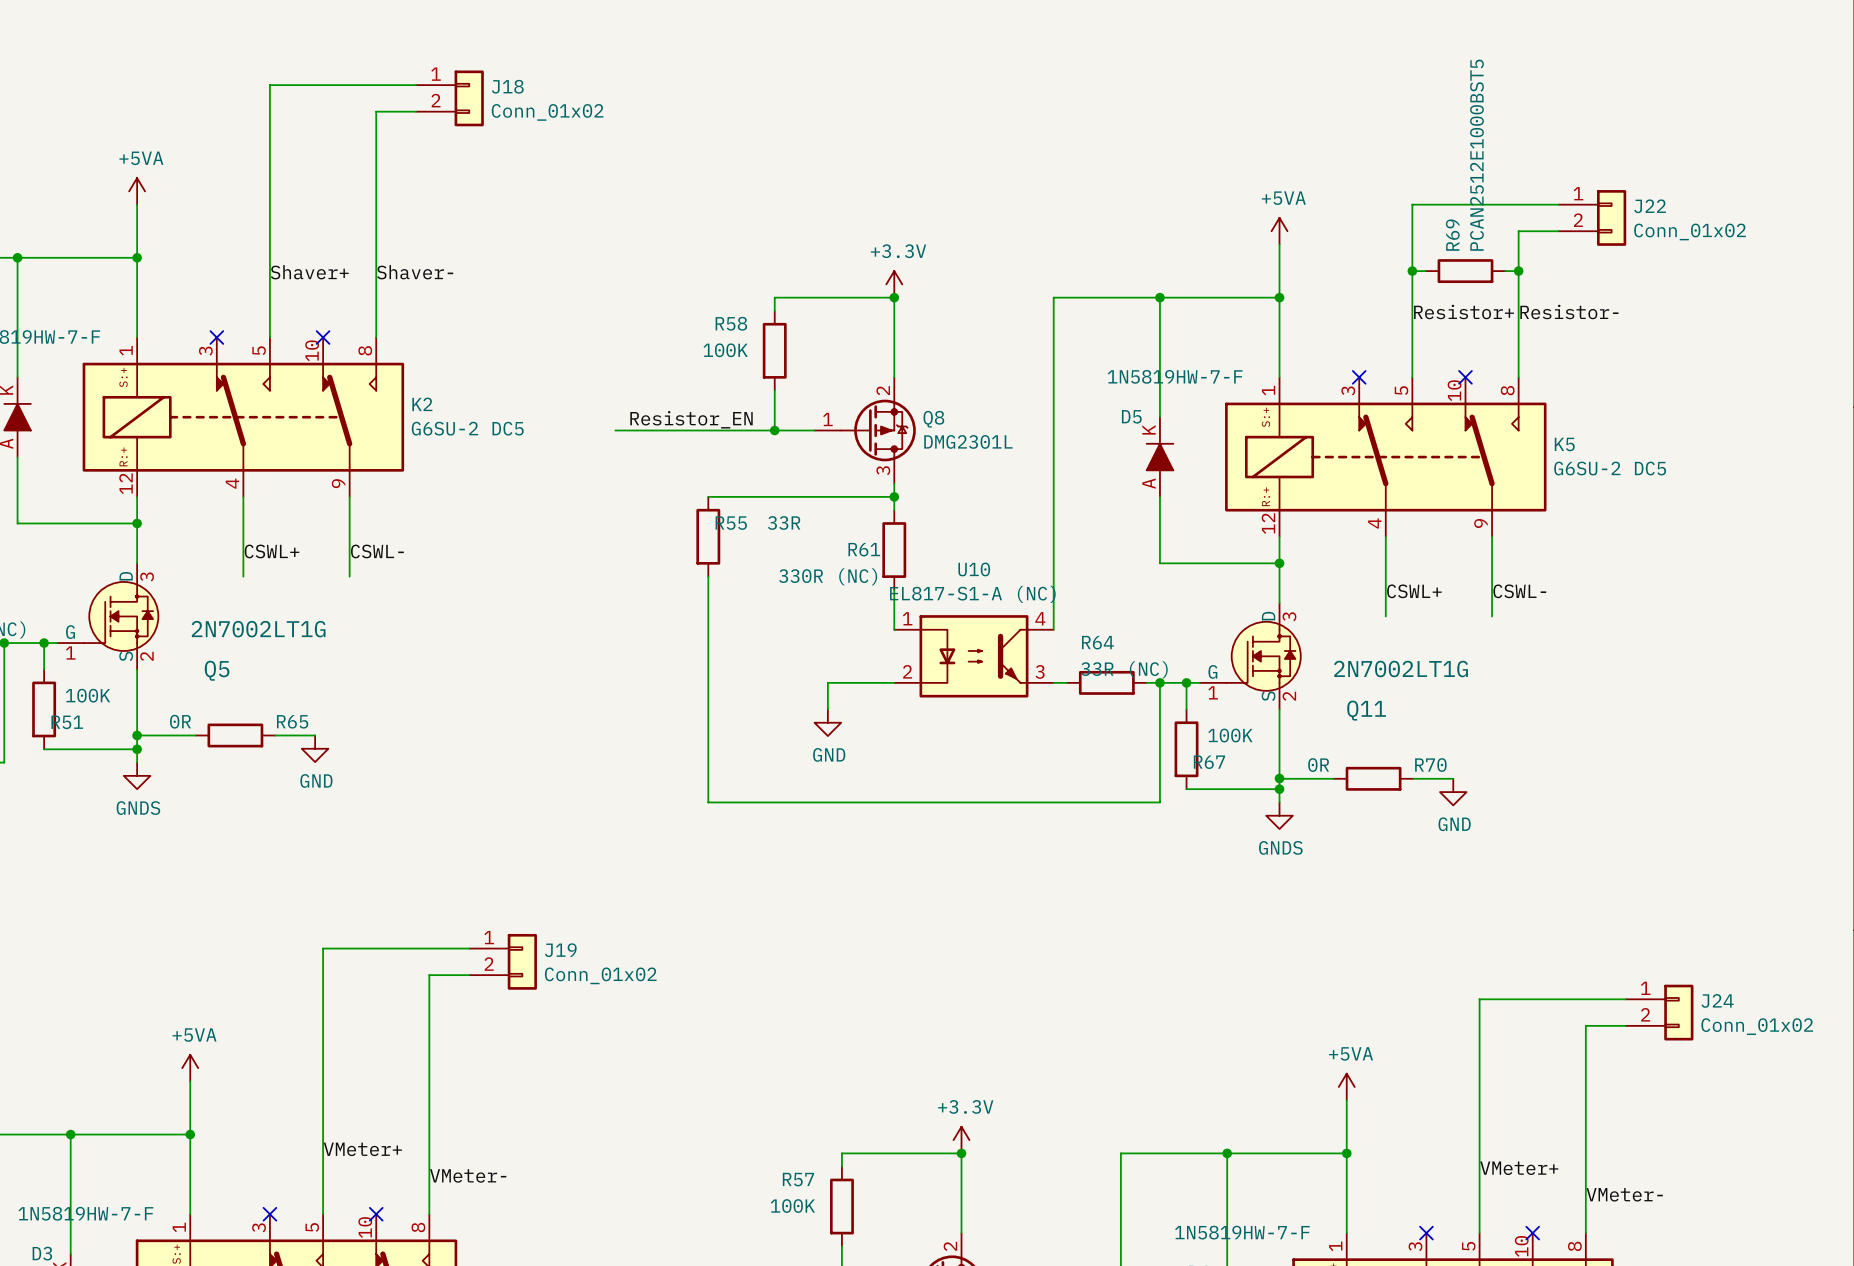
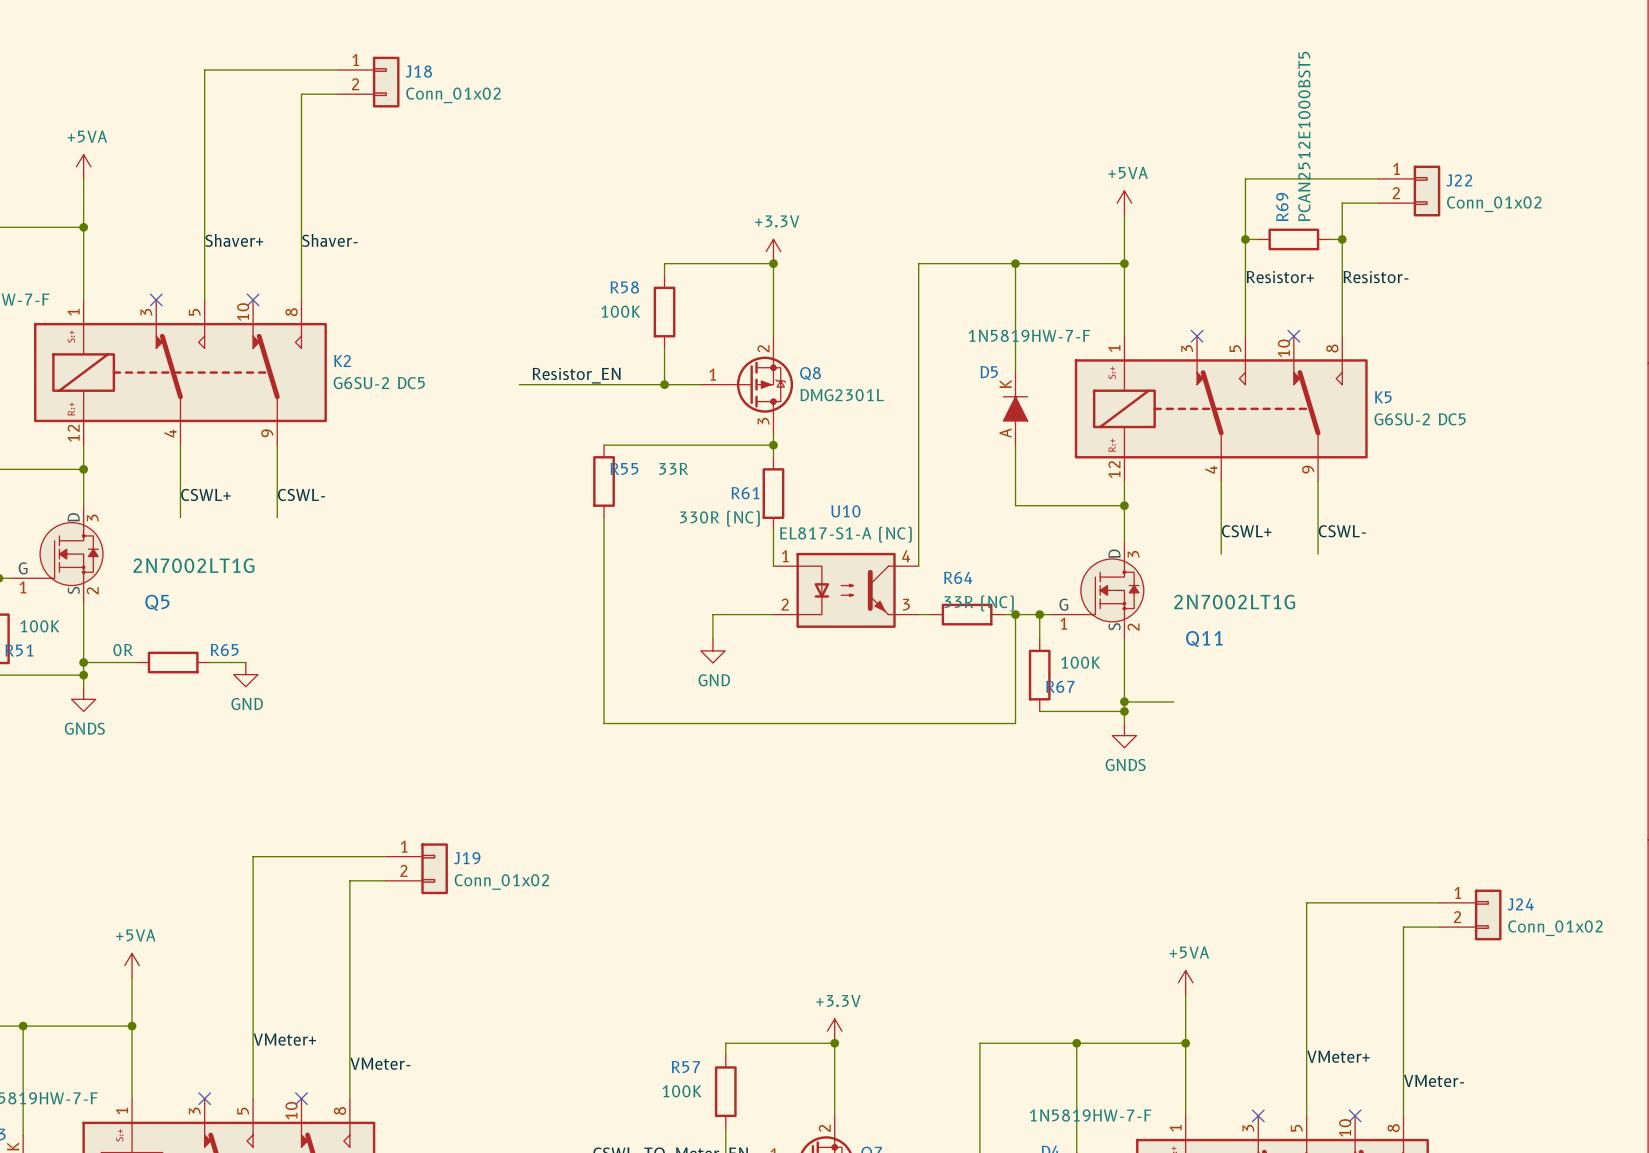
R70: 0R (1373, 778) -> none
wire: (1413, 778) (1453, 778) -> none
power symbol: GND (1453, 792) -> none

